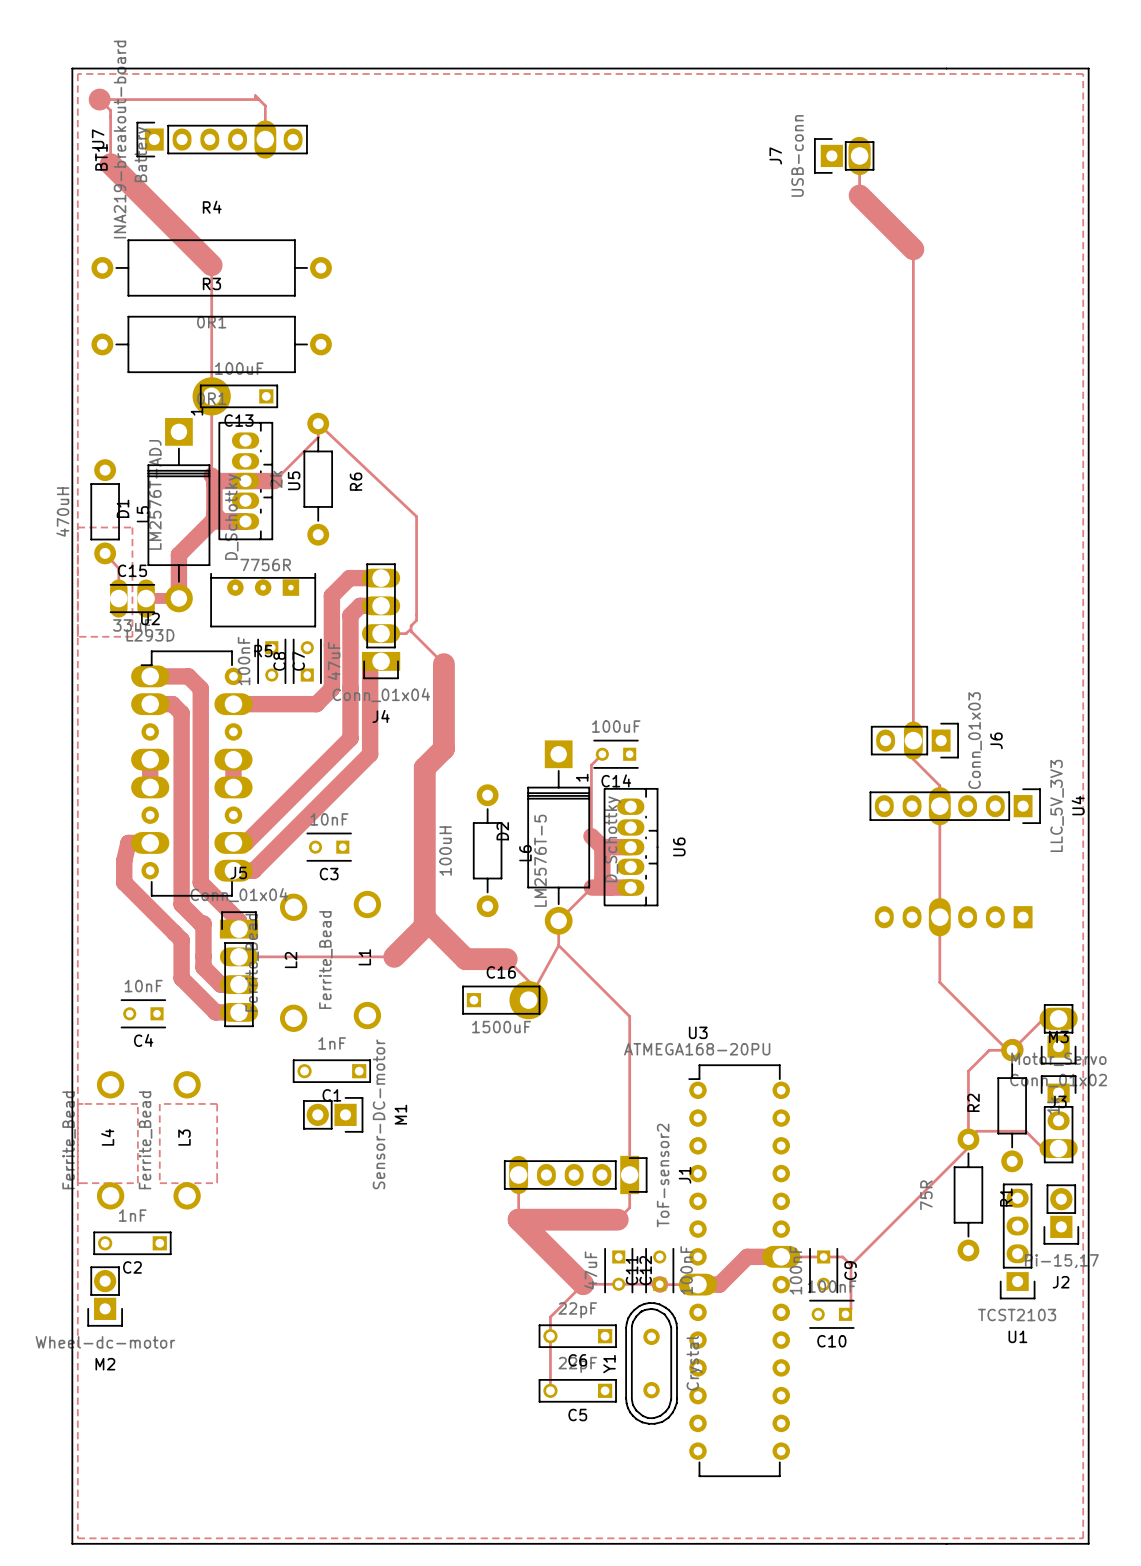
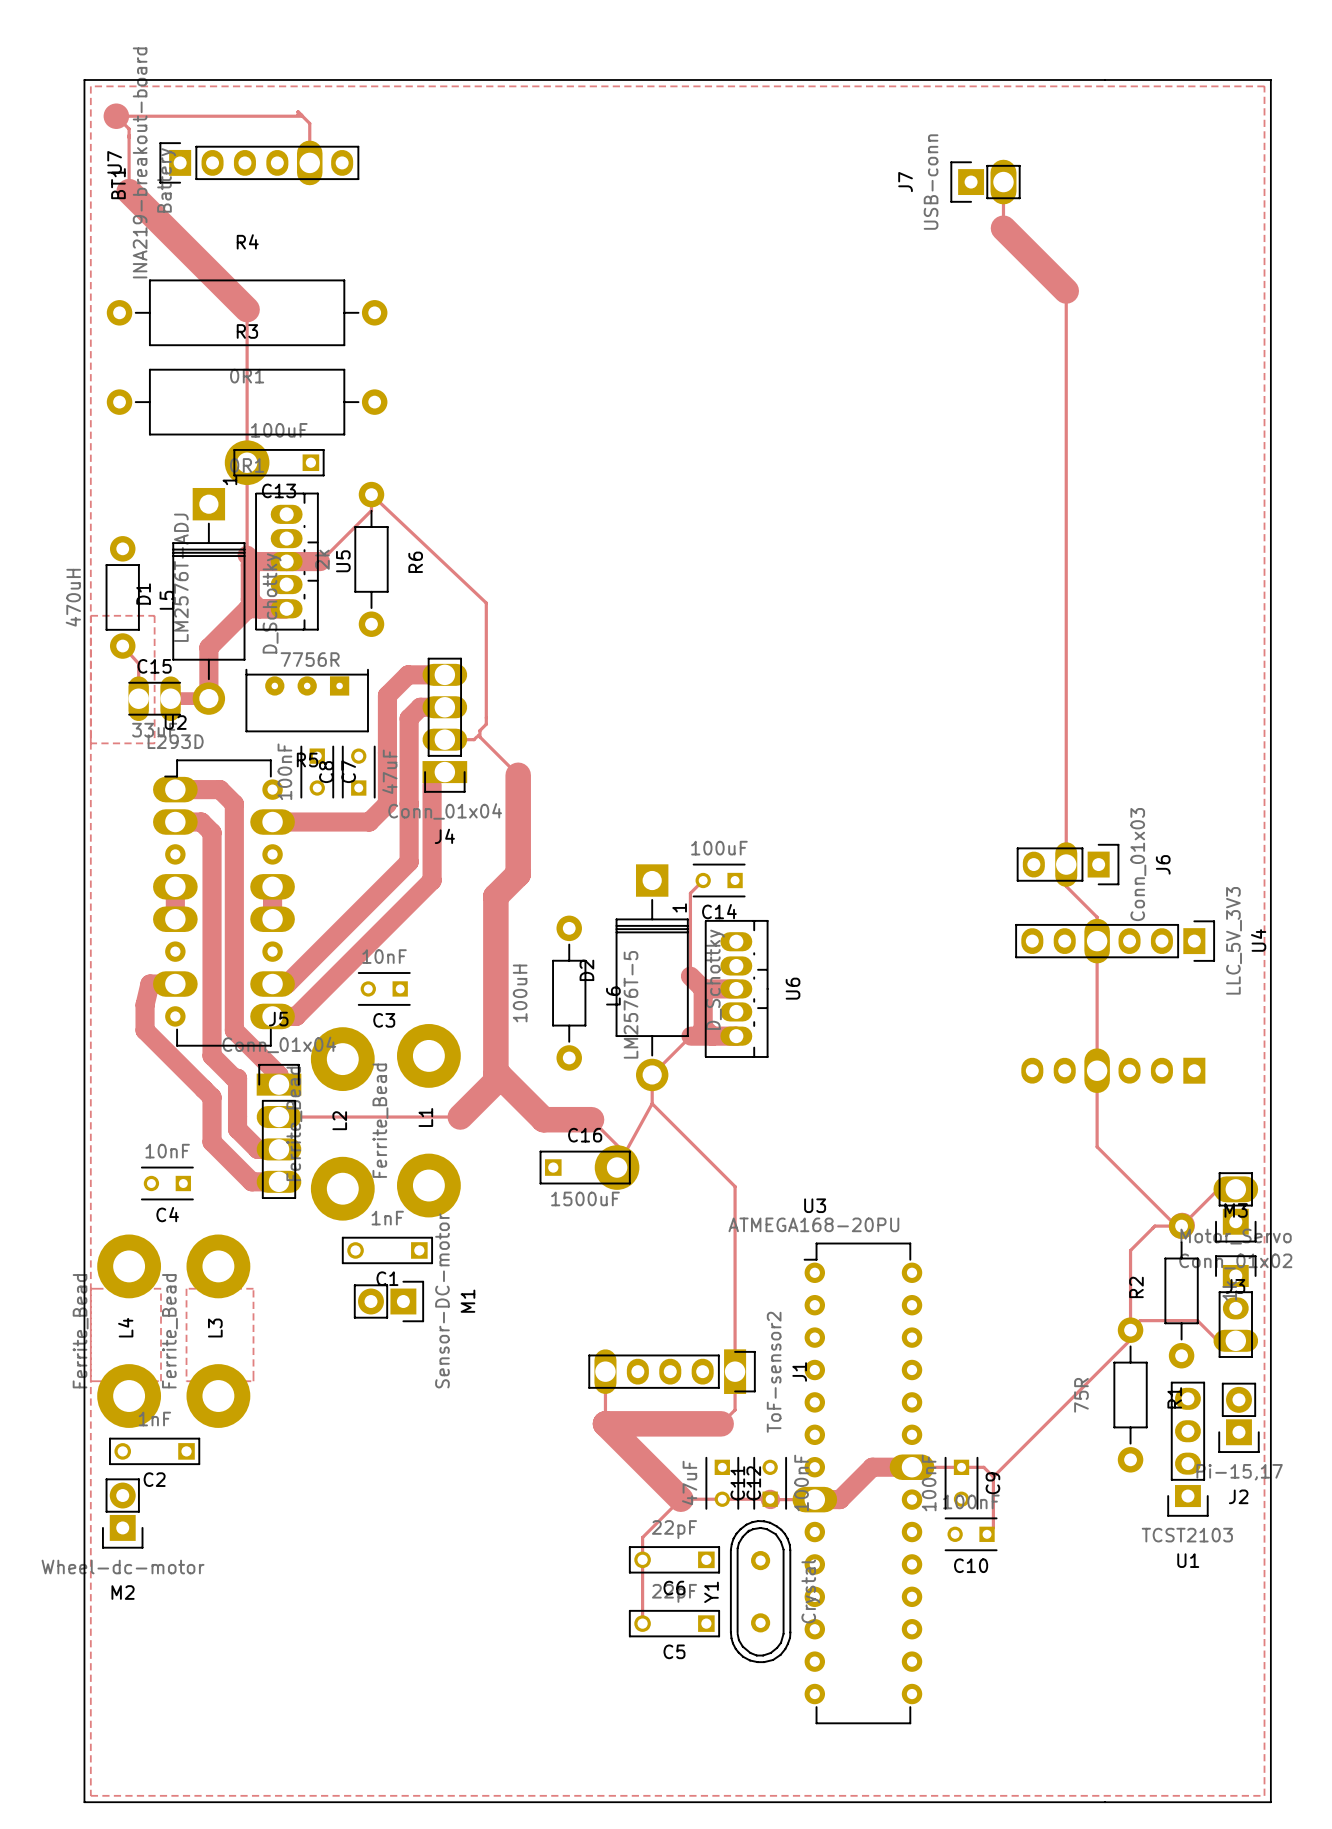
L1 footprint: [353, 890, 382, 1030] -> [397, 1024, 461, 1218]
L2 footprint: [279, 893, 308, 1032] -> [310, 1027, 375, 1221]
L4 footprint: [96, 1071, 125, 1210] -> [97, 1234, 162, 1428]
L3 footprint: [173, 1071, 201, 1210] -> [186, 1234, 251, 1428]

